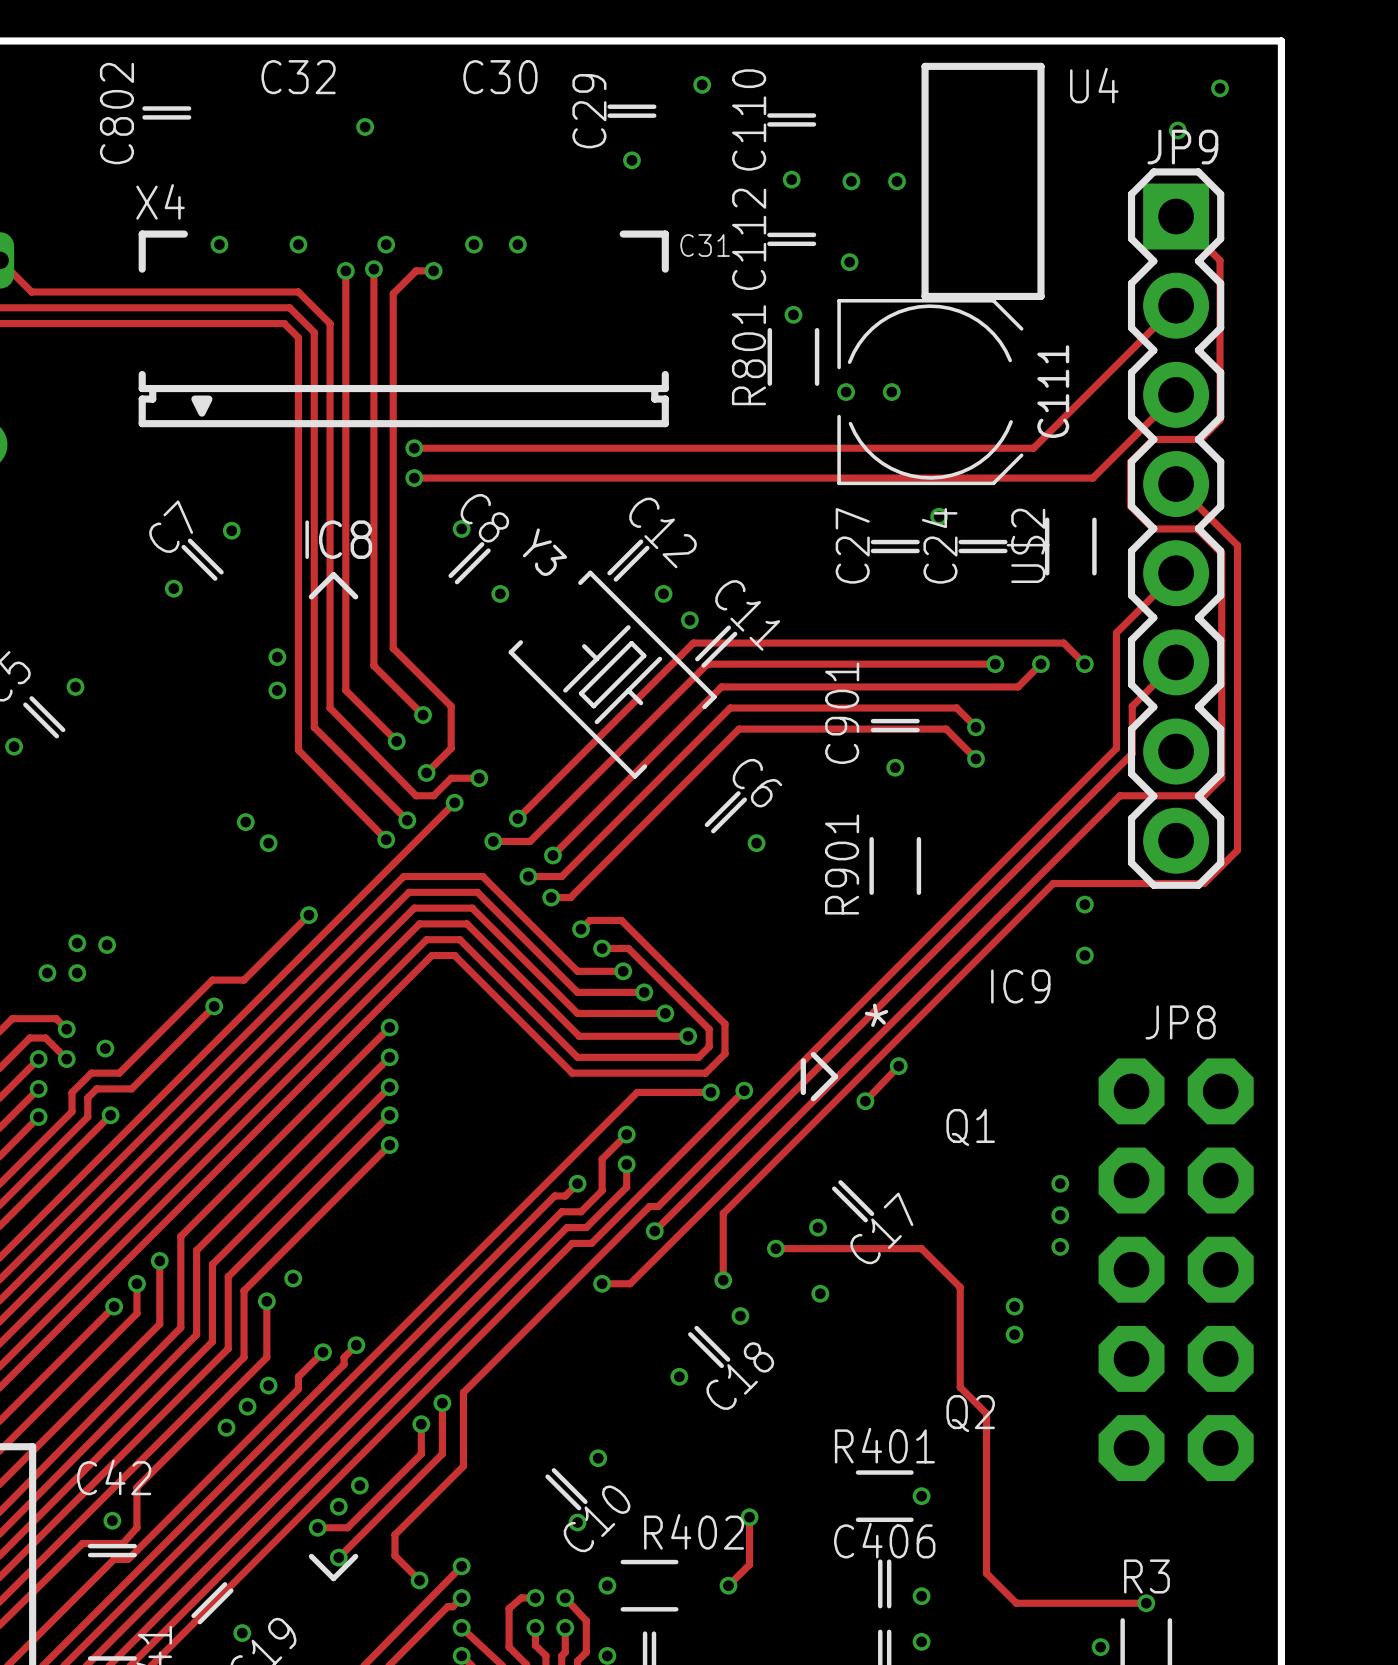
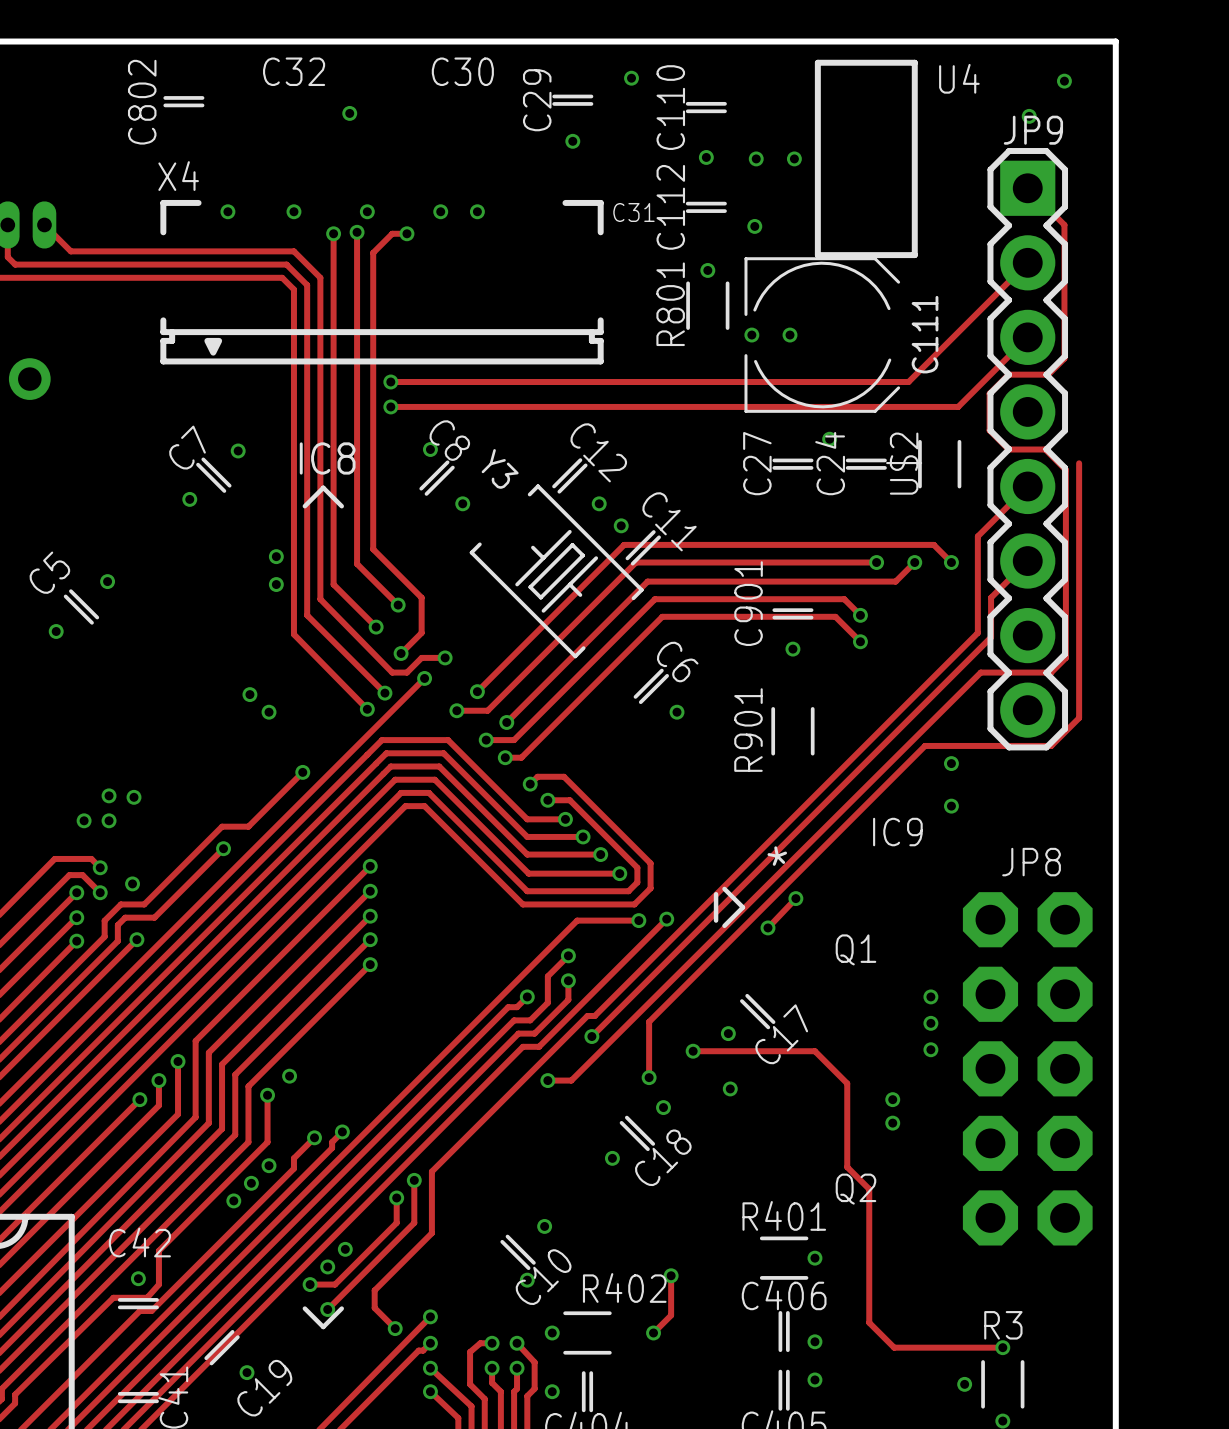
track: (1176, 484) (1237, 545) -> none

